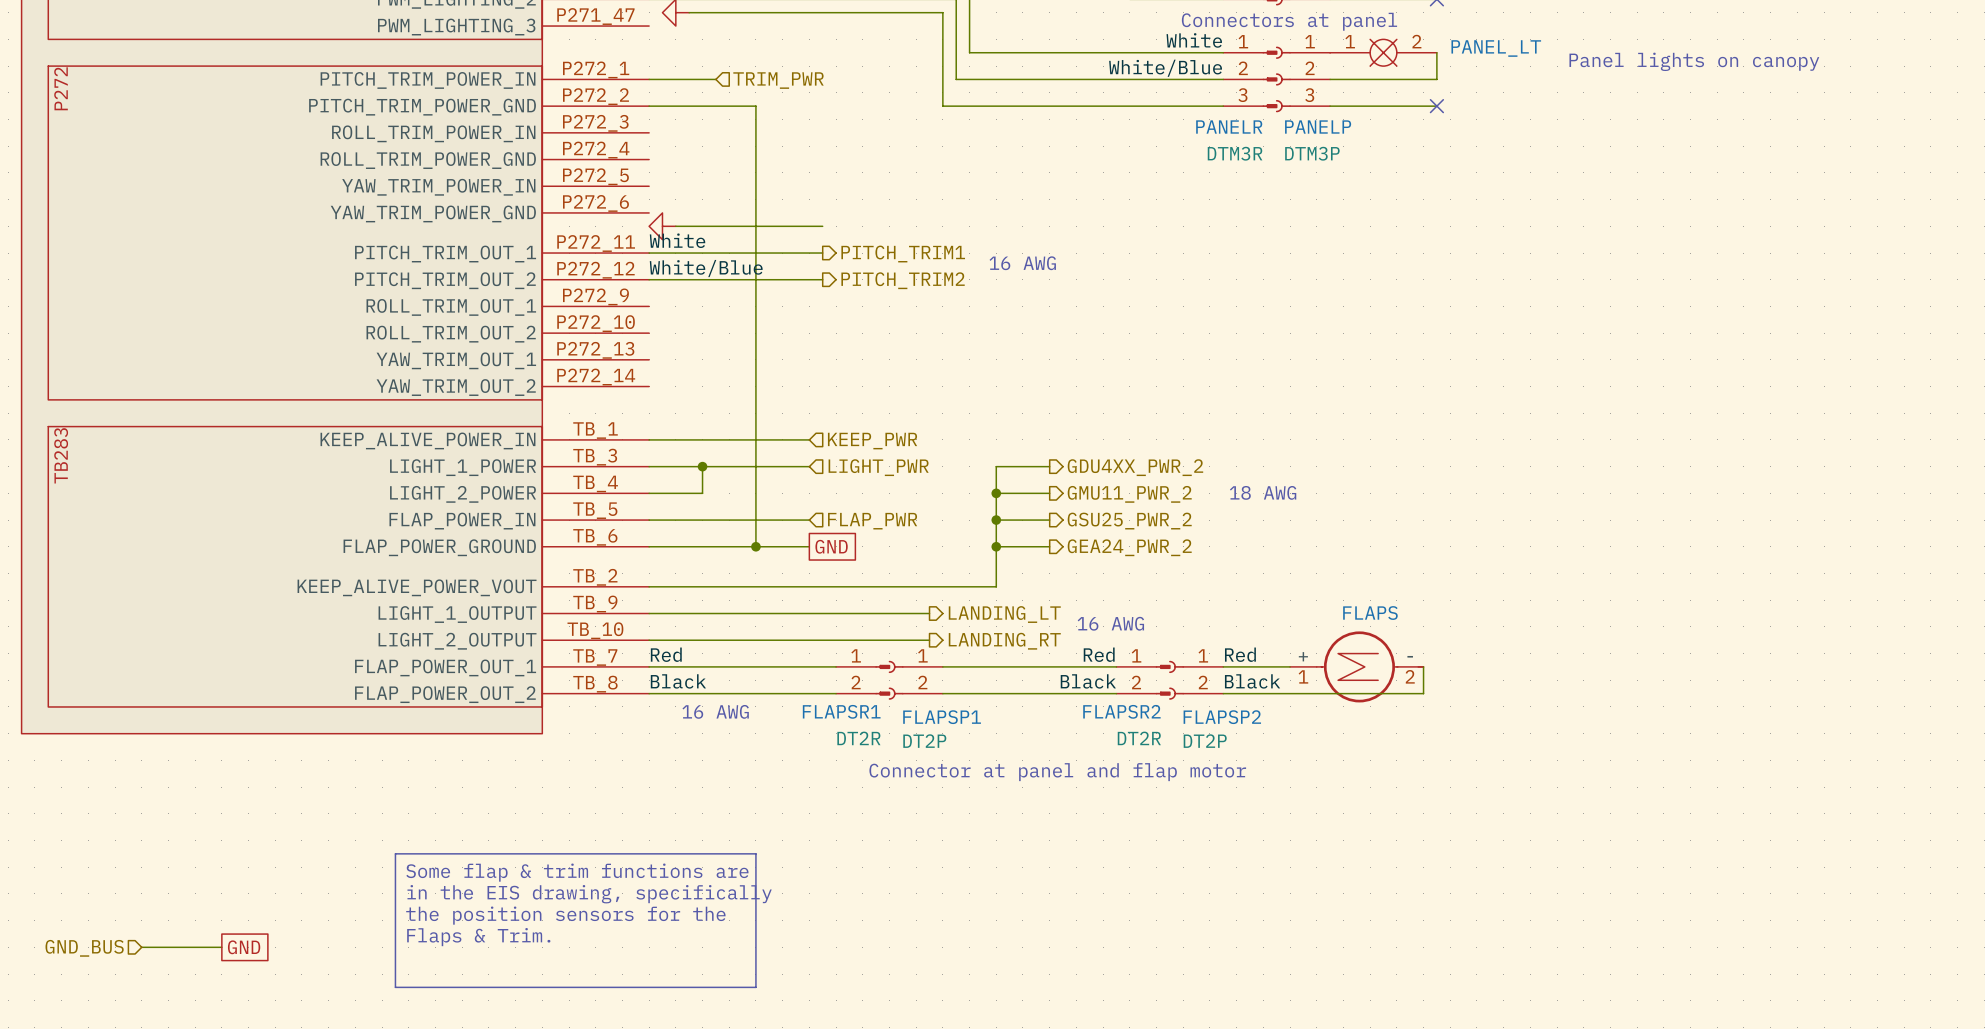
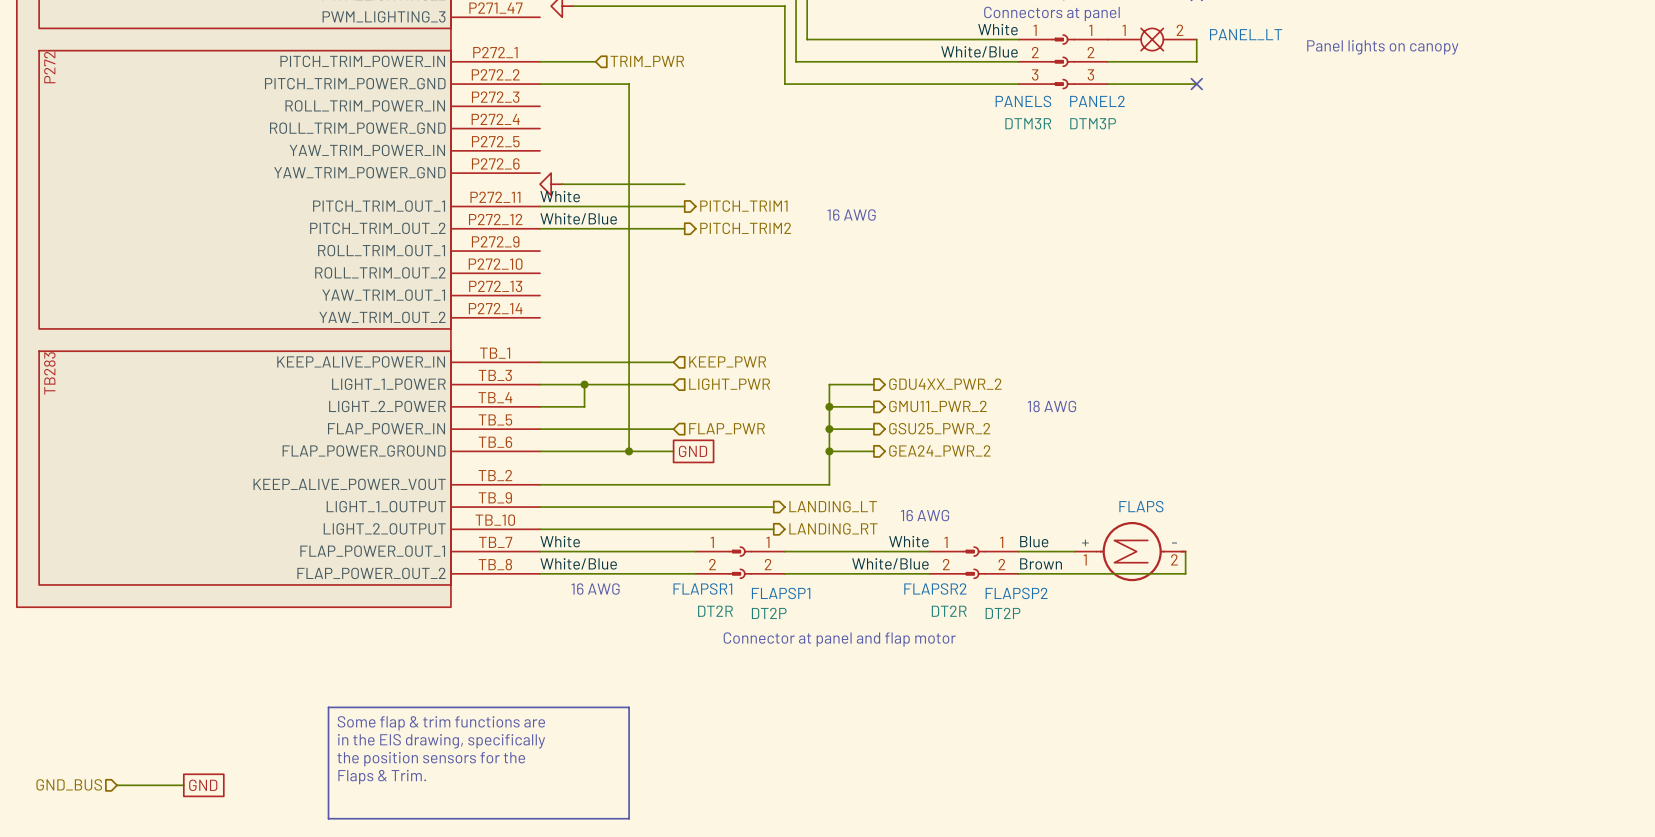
PANELR name: PANELR (1229, 127) -> PANELS (1023, 101)
PANELP name: PANELP (1318, 127) -> PANEL2 (1097, 101)
label: Red (666, 654) -> White (560, 541)
label: Red (1099, 654) -> White (908, 541)
label: Red (1240, 654) -> Blue (1034, 541)
label: Black (678, 681) -> White/Blue (578, 563)
label: Black (1088, 681) -> White/Blue (890, 563)
label: Black (1252, 681) -> Brown (1041, 563)

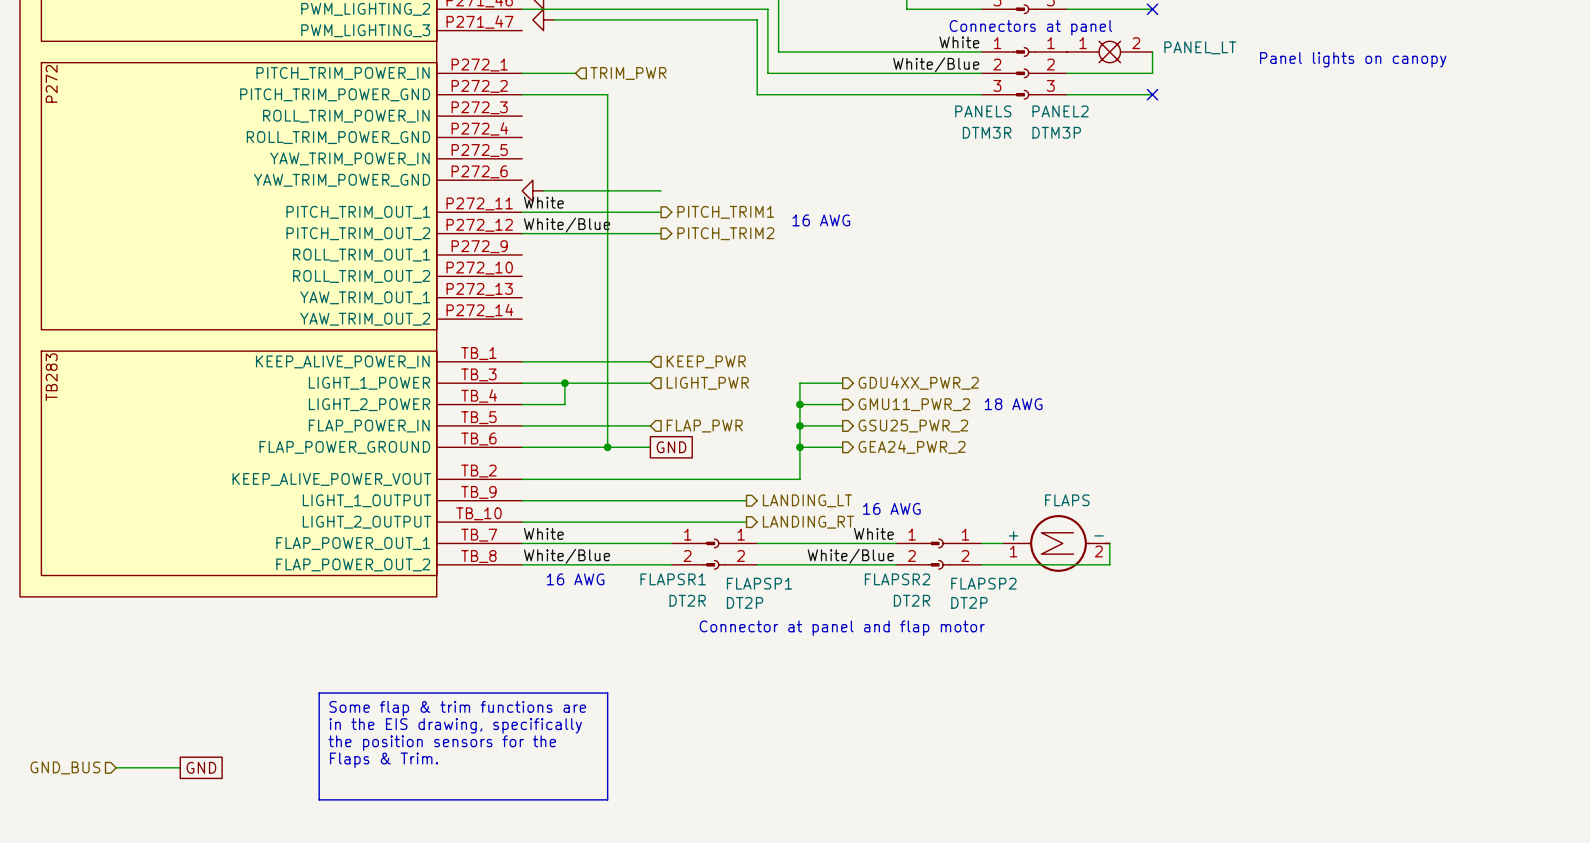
label: Blue (1034, 541) -> none
FLAPS position: (1129, 551) -> (1056, 543)
wire: (1185, 551) (1185, 573) (1152, 573) -> (1109, 543) (1109, 564)
label: Brown (1041, 563) -> none

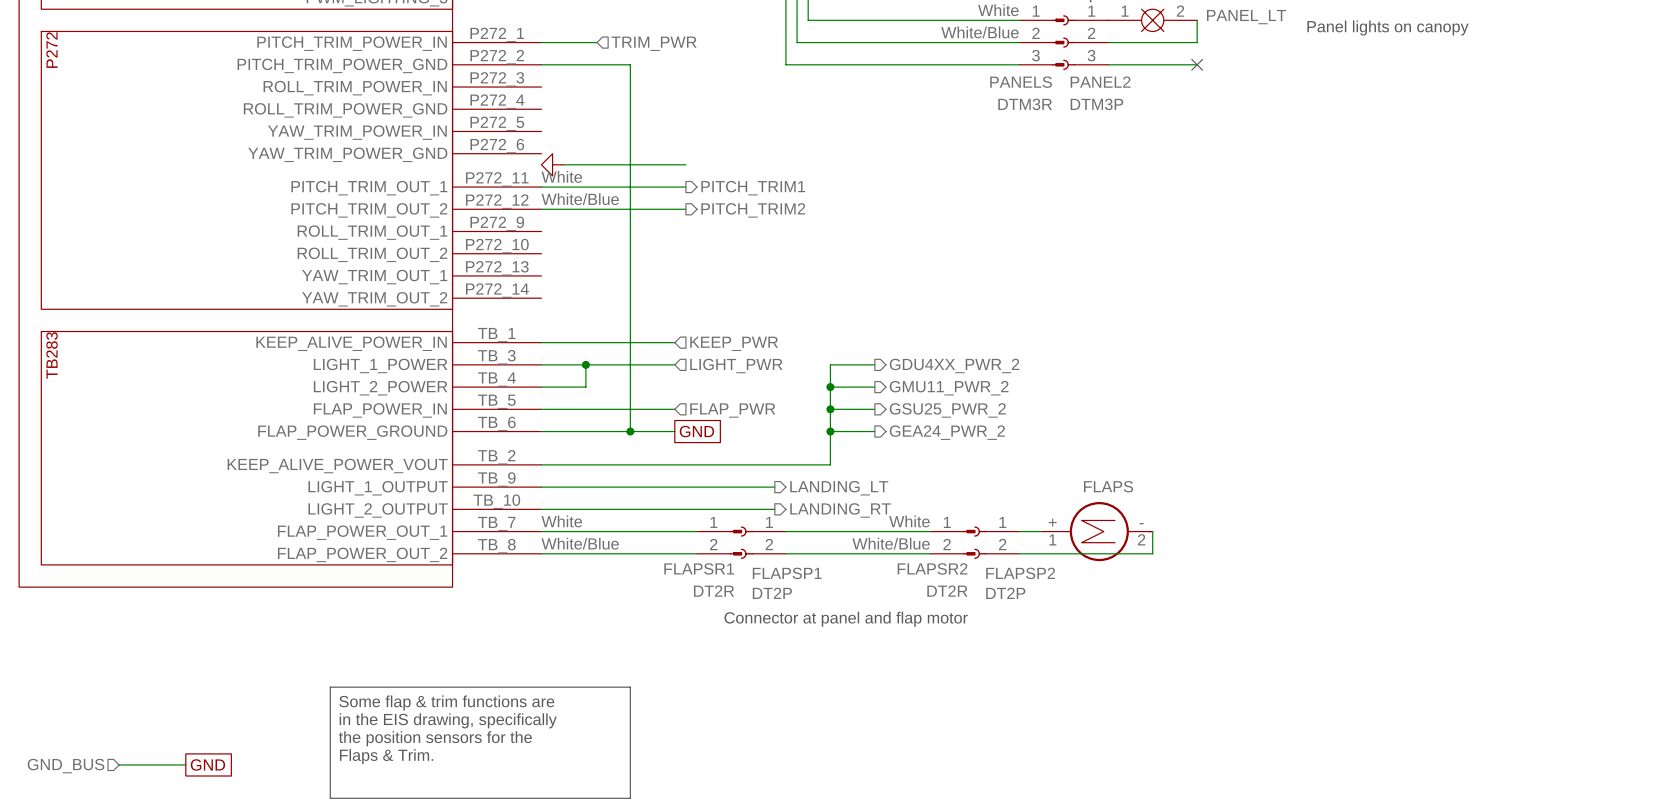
text: 16 AWG (821, 220) -> none
text: 18 AWG (1013, 404) -> none
text: 16 AWG (891, 508) -> none
text: 16 AWG (575, 579) -> none

